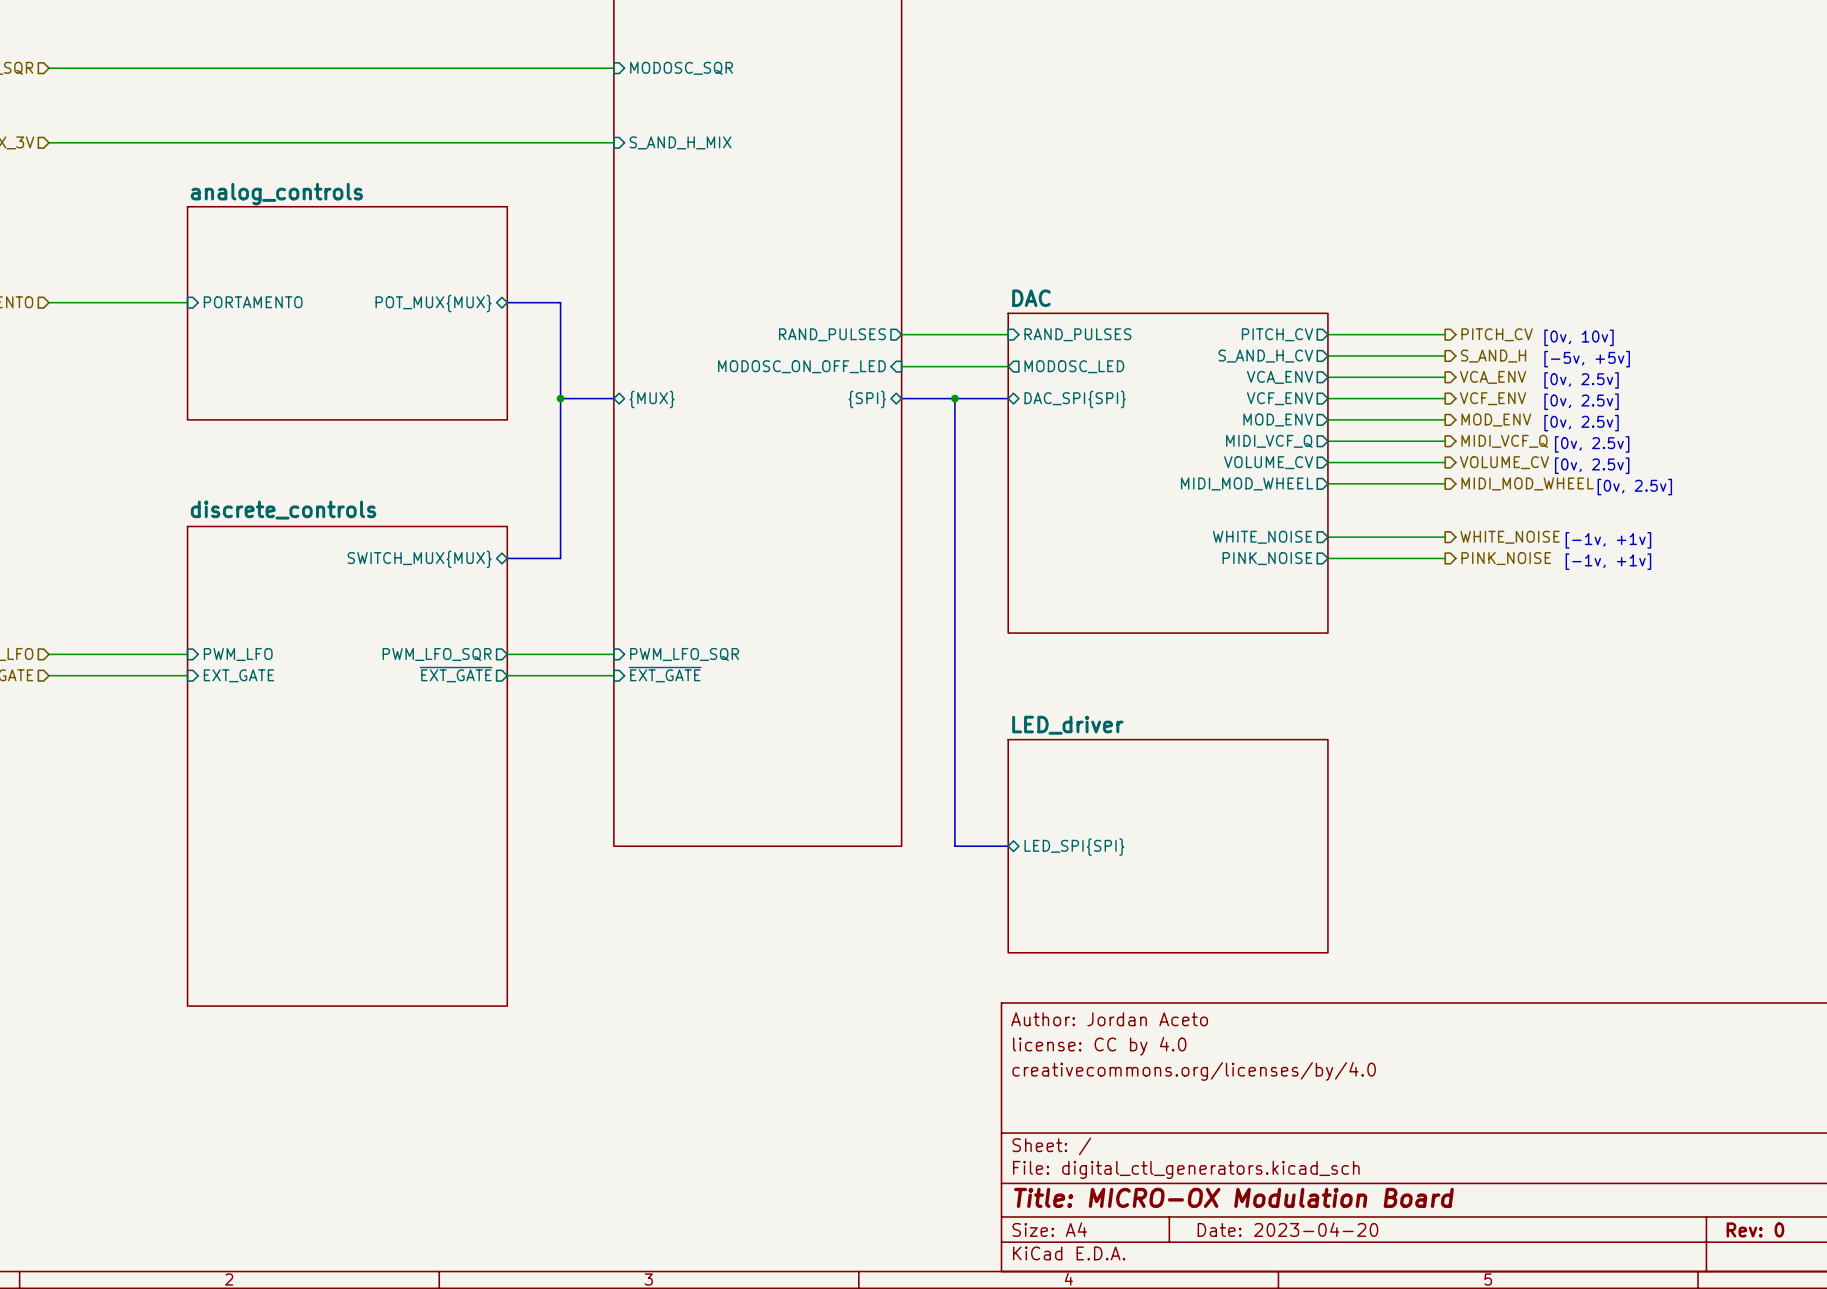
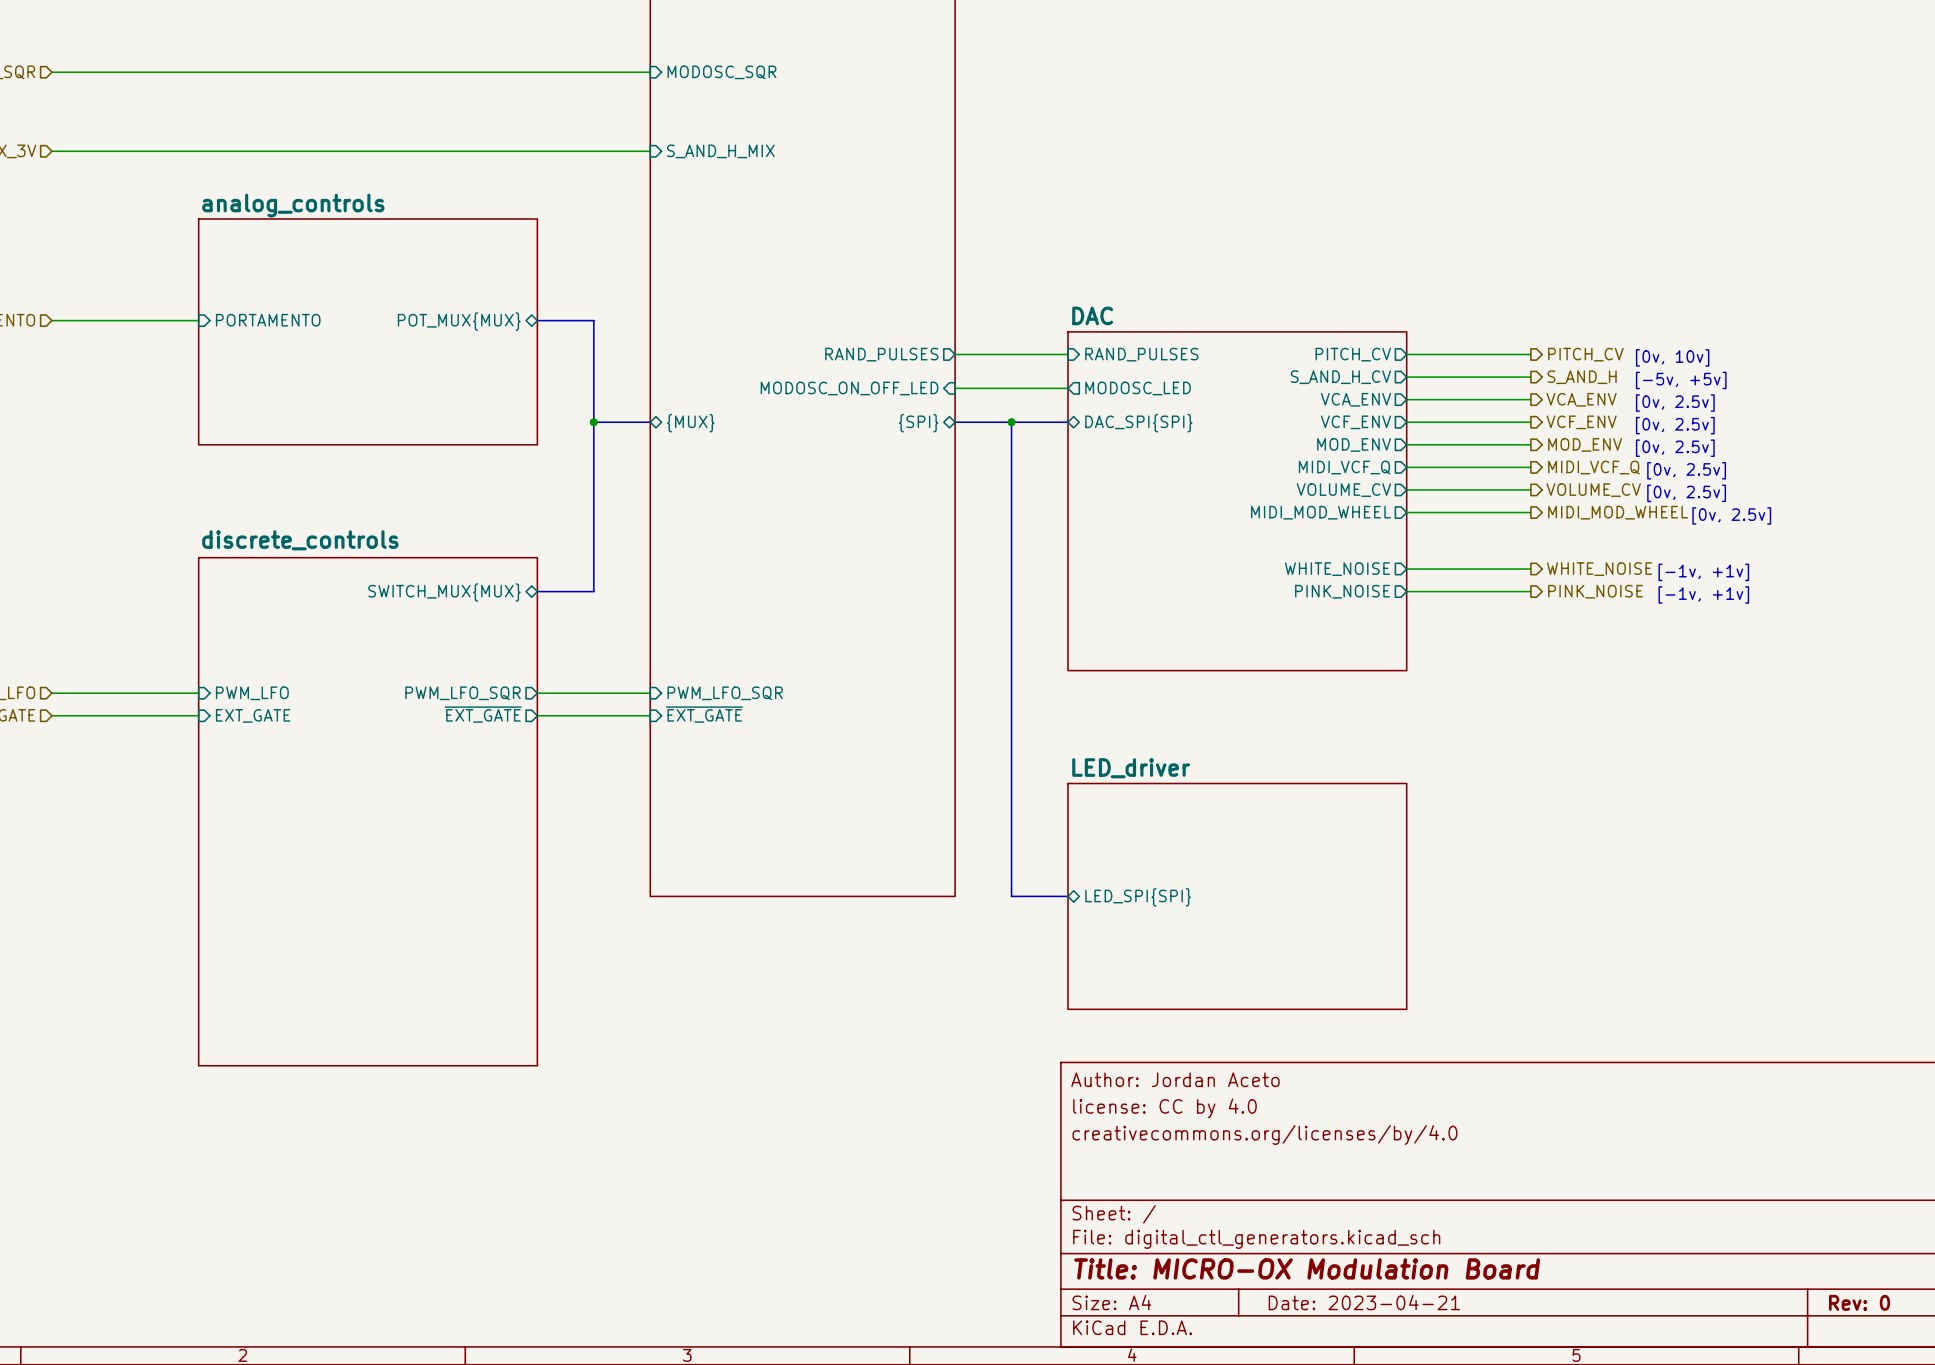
title block: Date: 2023-04-20 (1287, 1229) -> Date: 2023-04-21 (1364, 1302)

